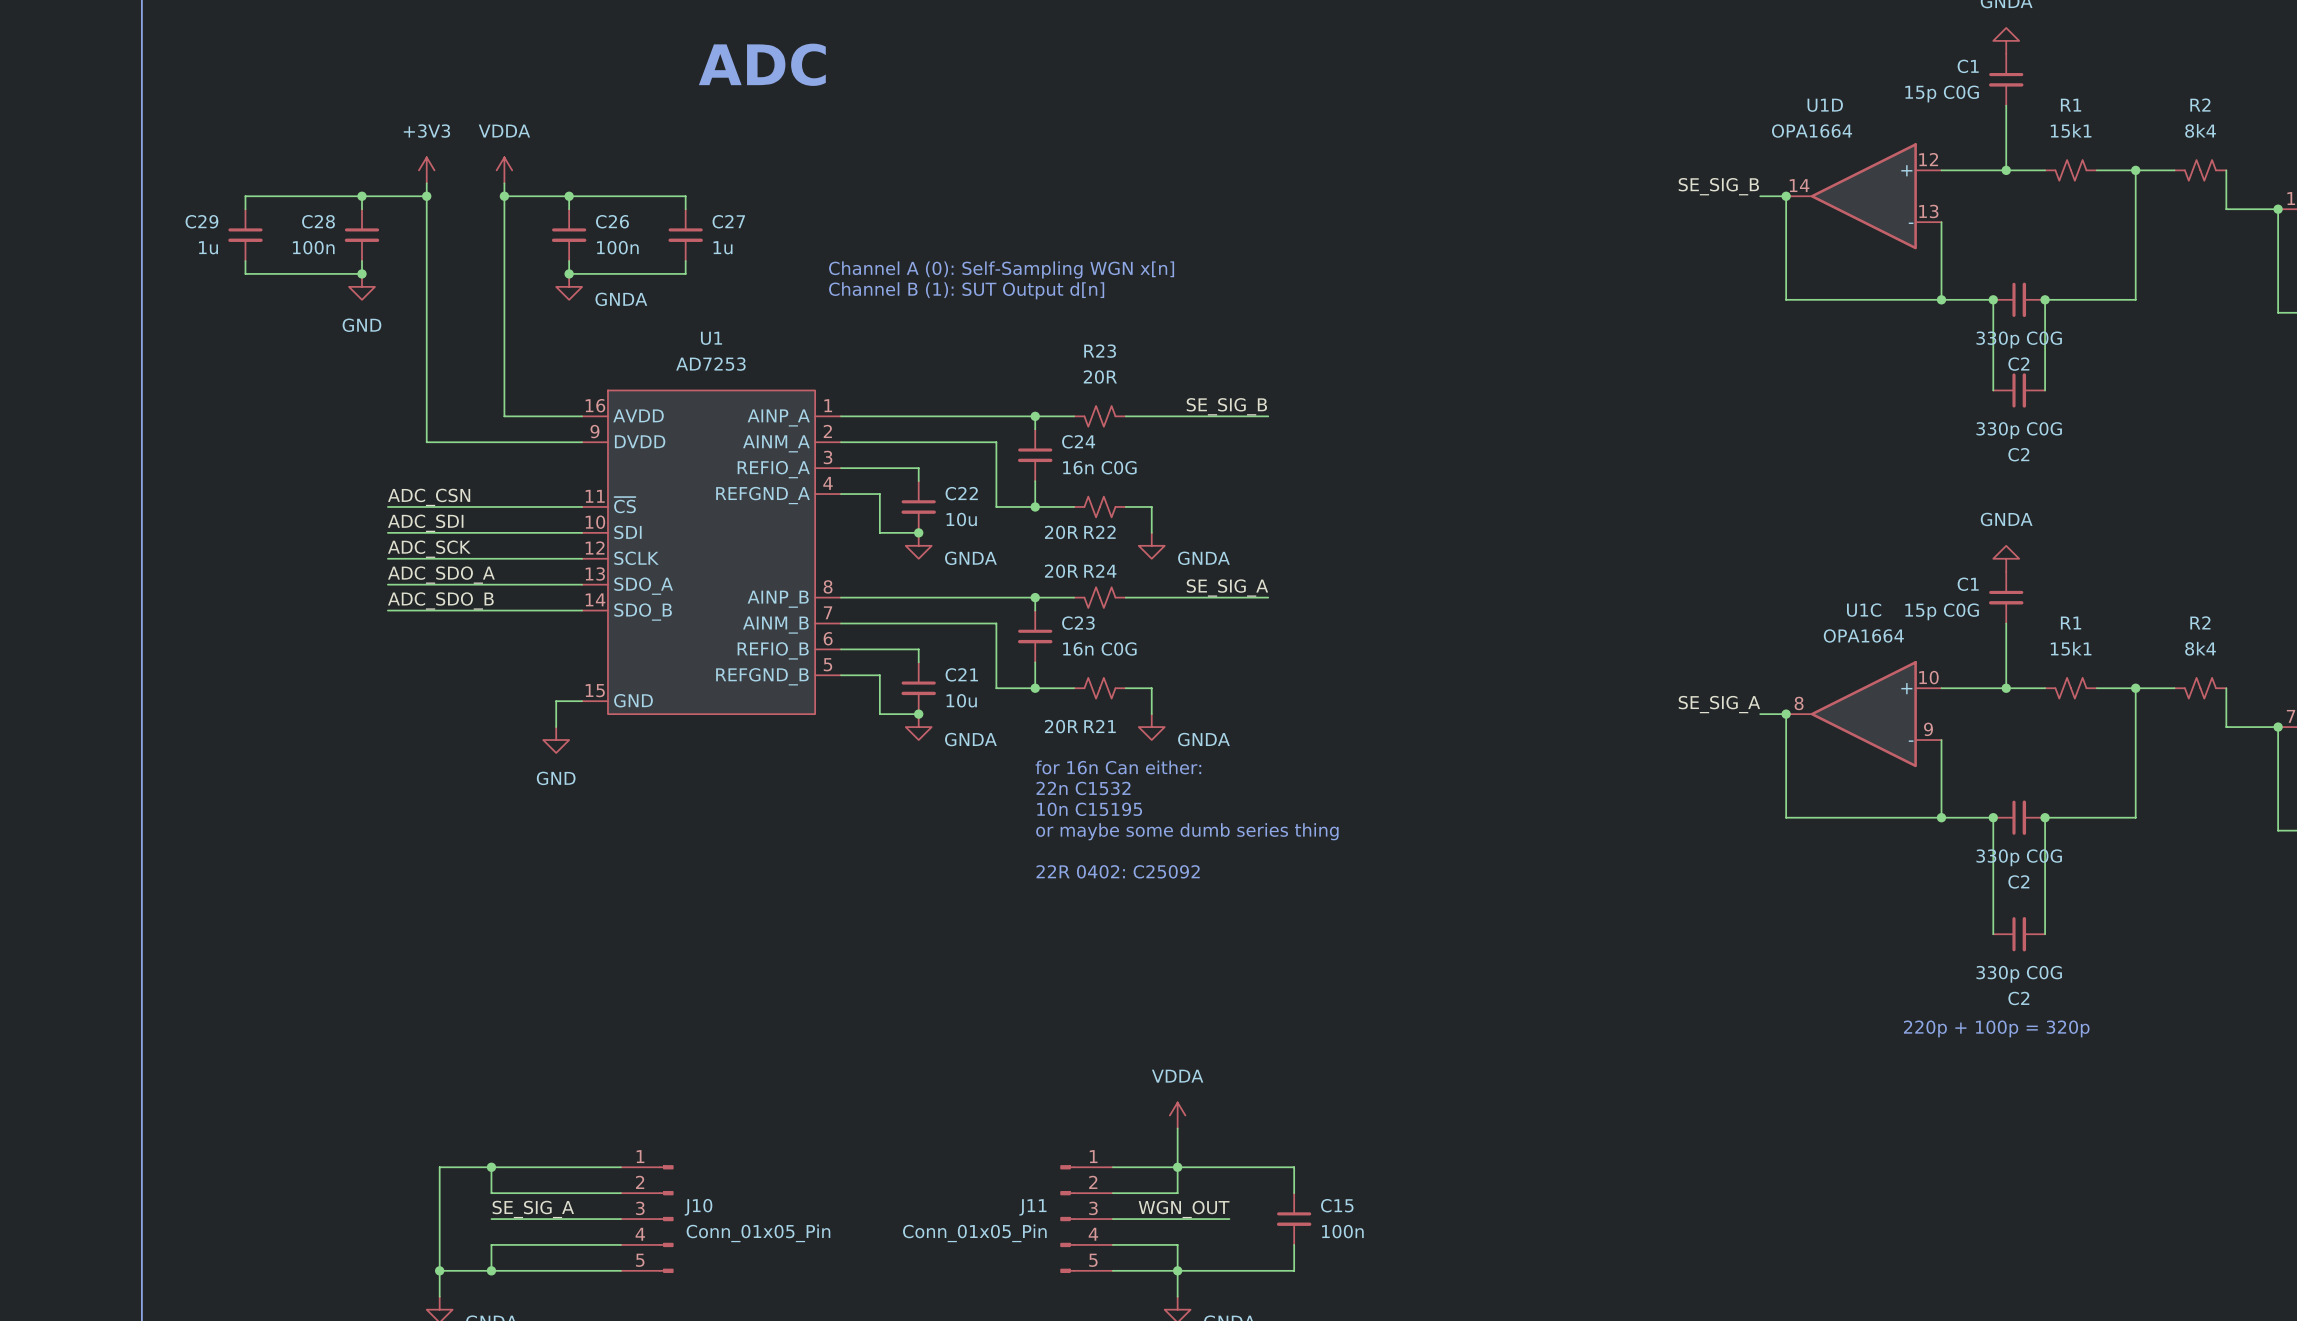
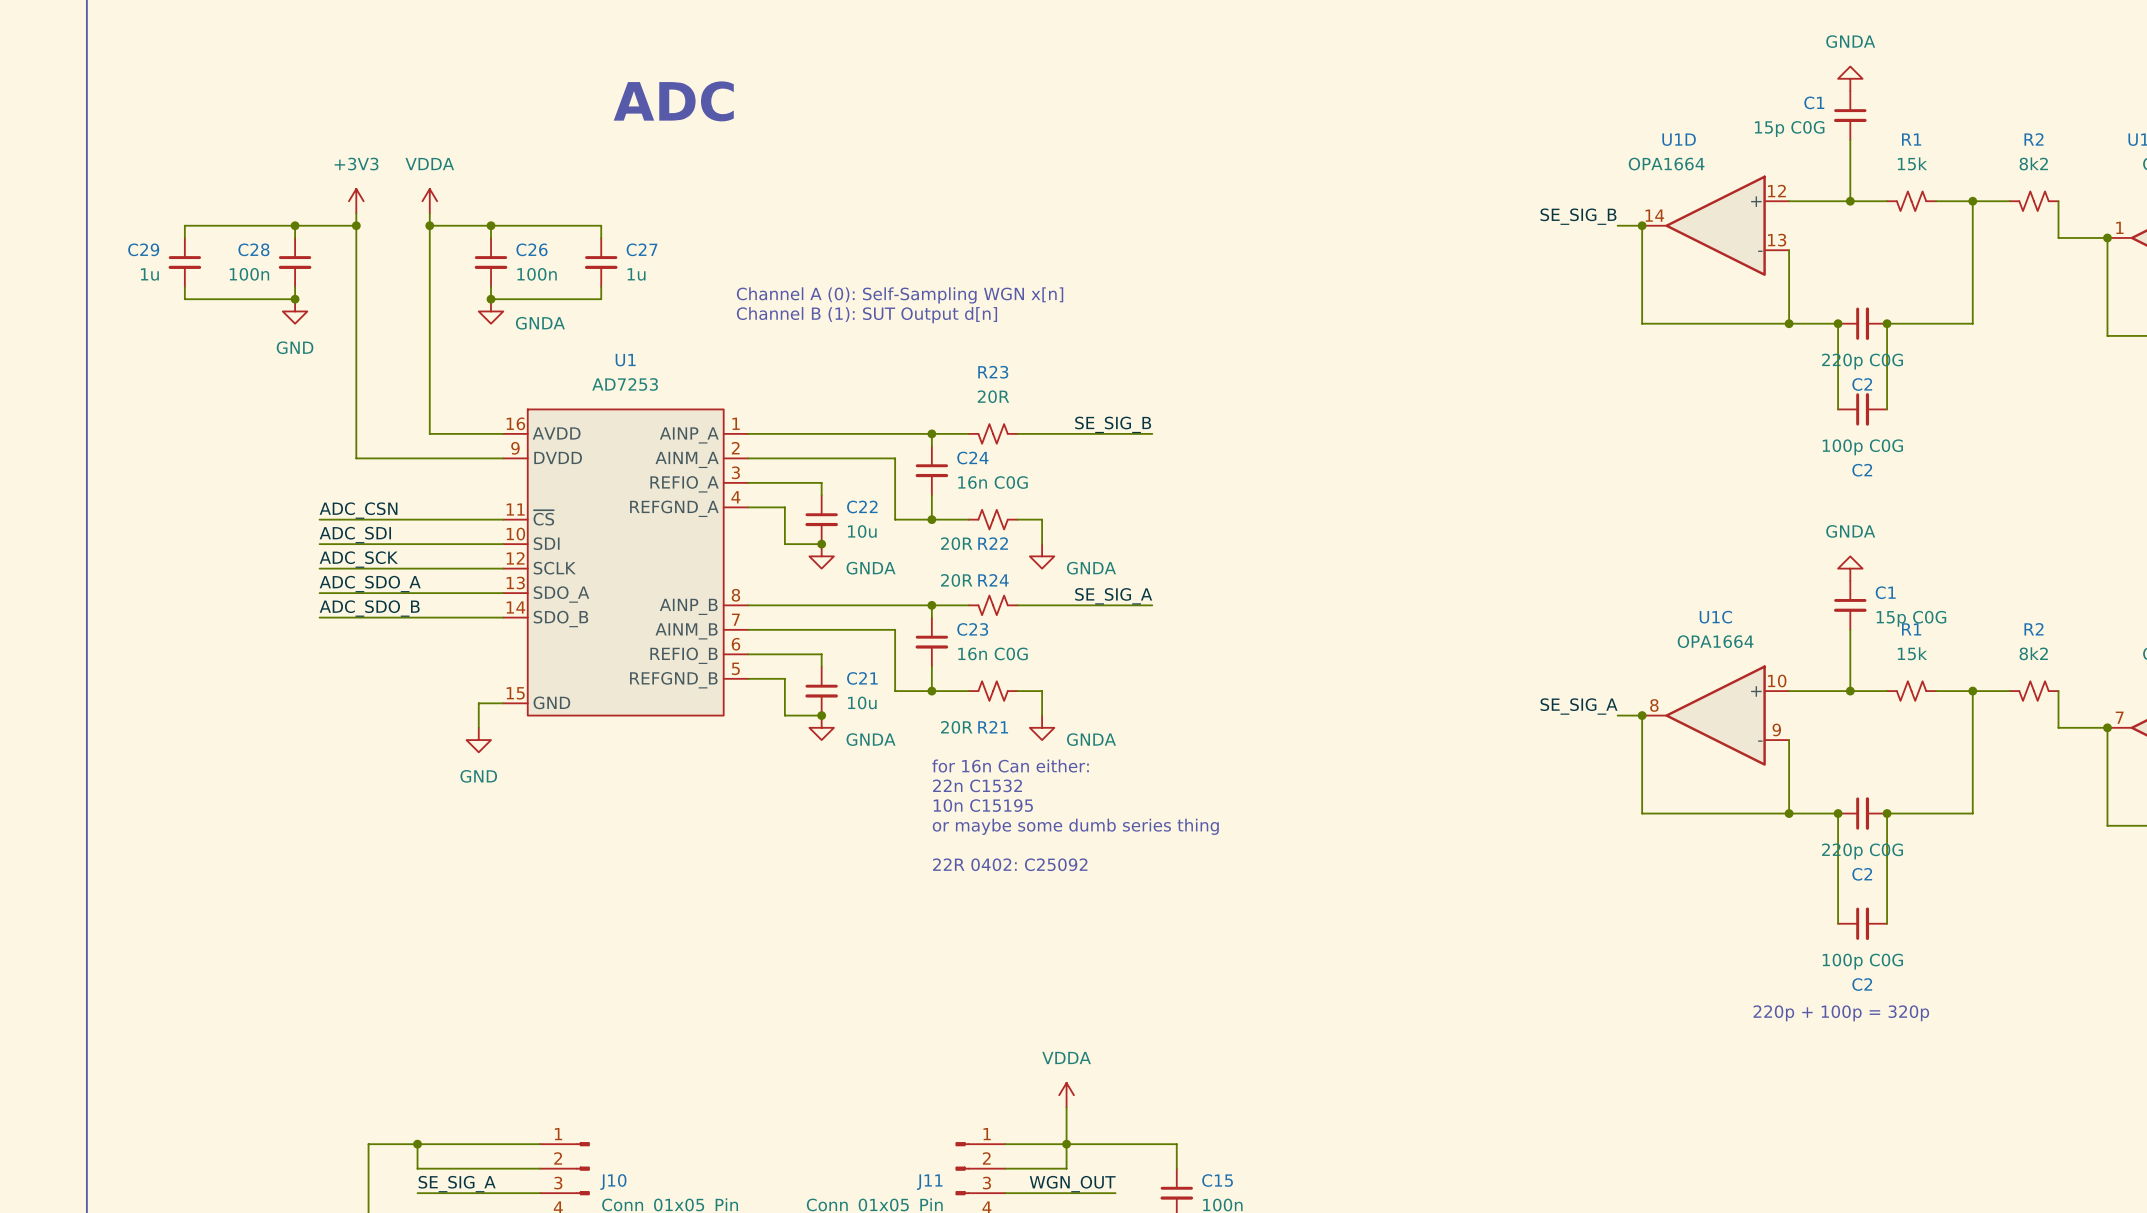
R1 value: 15k1 (2071, 130) -> 15k (1912, 163)
R2 value: 8k4 (2200, 130) -> 8k2 (2033, 163)
C2 value: 330p C0G (2019, 339) -> 220p C0G (1862, 361)
C2 value: 330p C0G (2019, 430) -> 100p C0G (1862, 447)
C1 name position: C1 (1968, 584) -> C1 (1885, 592)
C1 value position: 15p C0G (1942, 611) -> 15p C0G (1911, 618)
R1 value: 15k1 (2071, 648) -> 15k (1912, 653)
R2 value: 8k4 (2200, 648) -> 8k2 (2033, 653)
C2 value: 330p C0G (2019, 857) -> 220p C0G (1862, 851)
C2 value: 330p C0G (2019, 974) -> 100p C0G (1862, 961)

